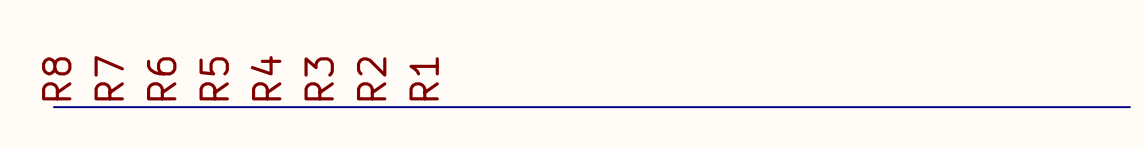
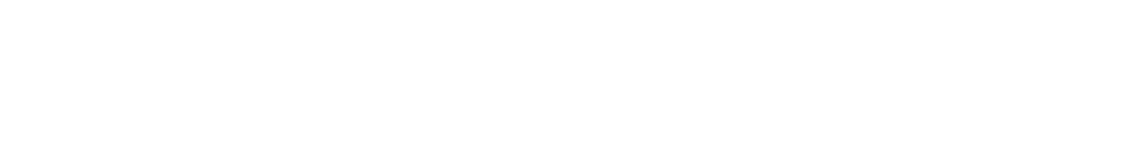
label: R8 (56, 78) -> none
label: R7 (109, 78) -> none
label: R6 (161, 78) -> none
label: R5 (214, 78) -> none
label: R4 (266, 78) -> none
label: R3 (319, 78) -> none
label: R2 (371, 78) -> none
label: R1 (424, 78) -> none
bus: (53, 107) (1129, 107) -> none

